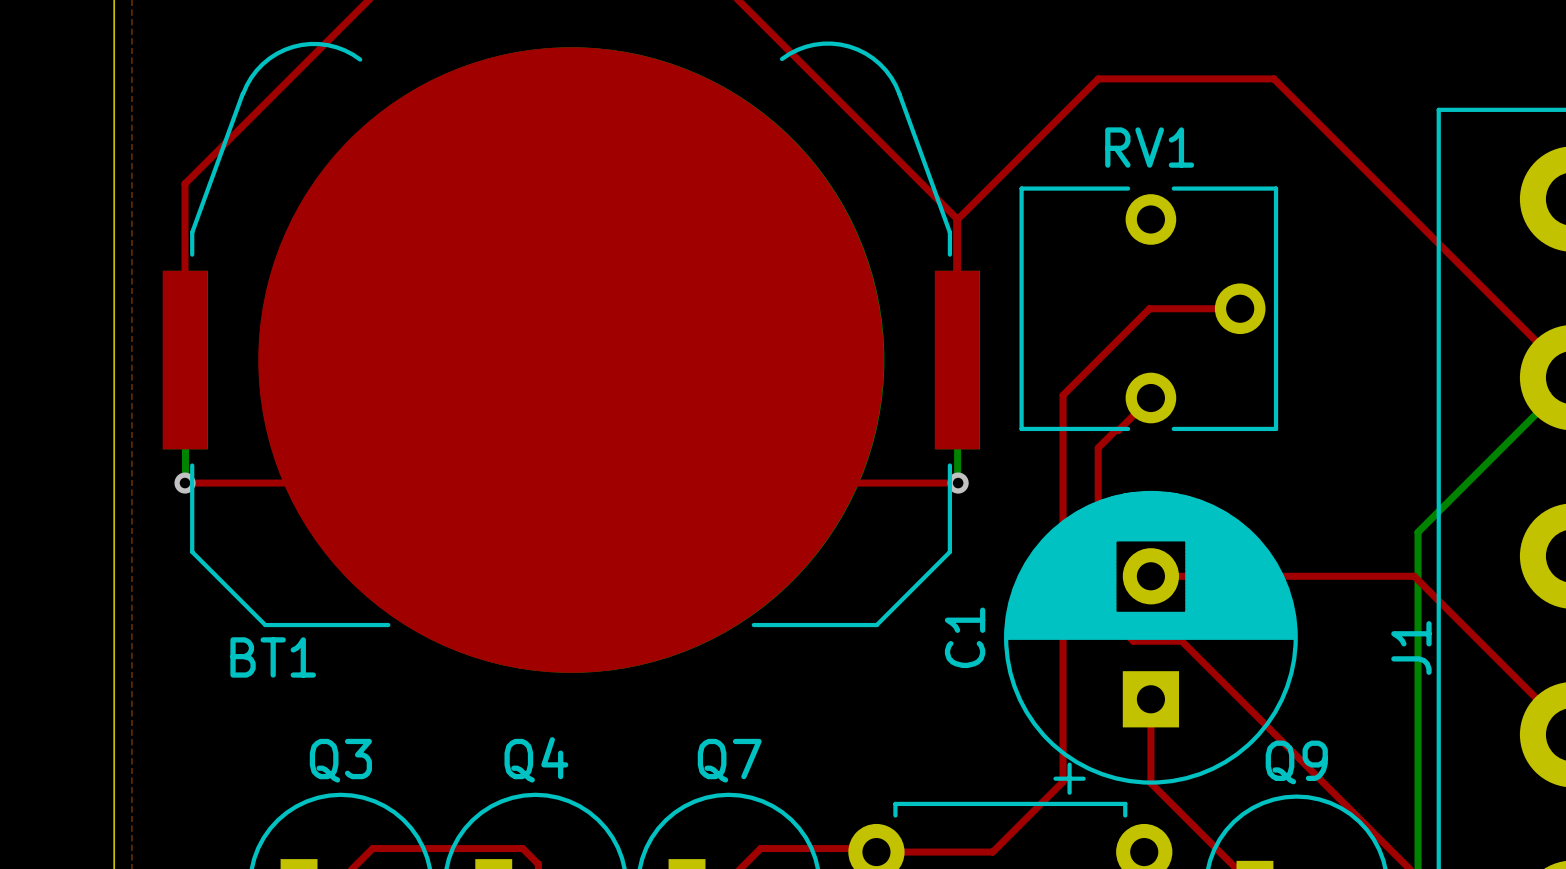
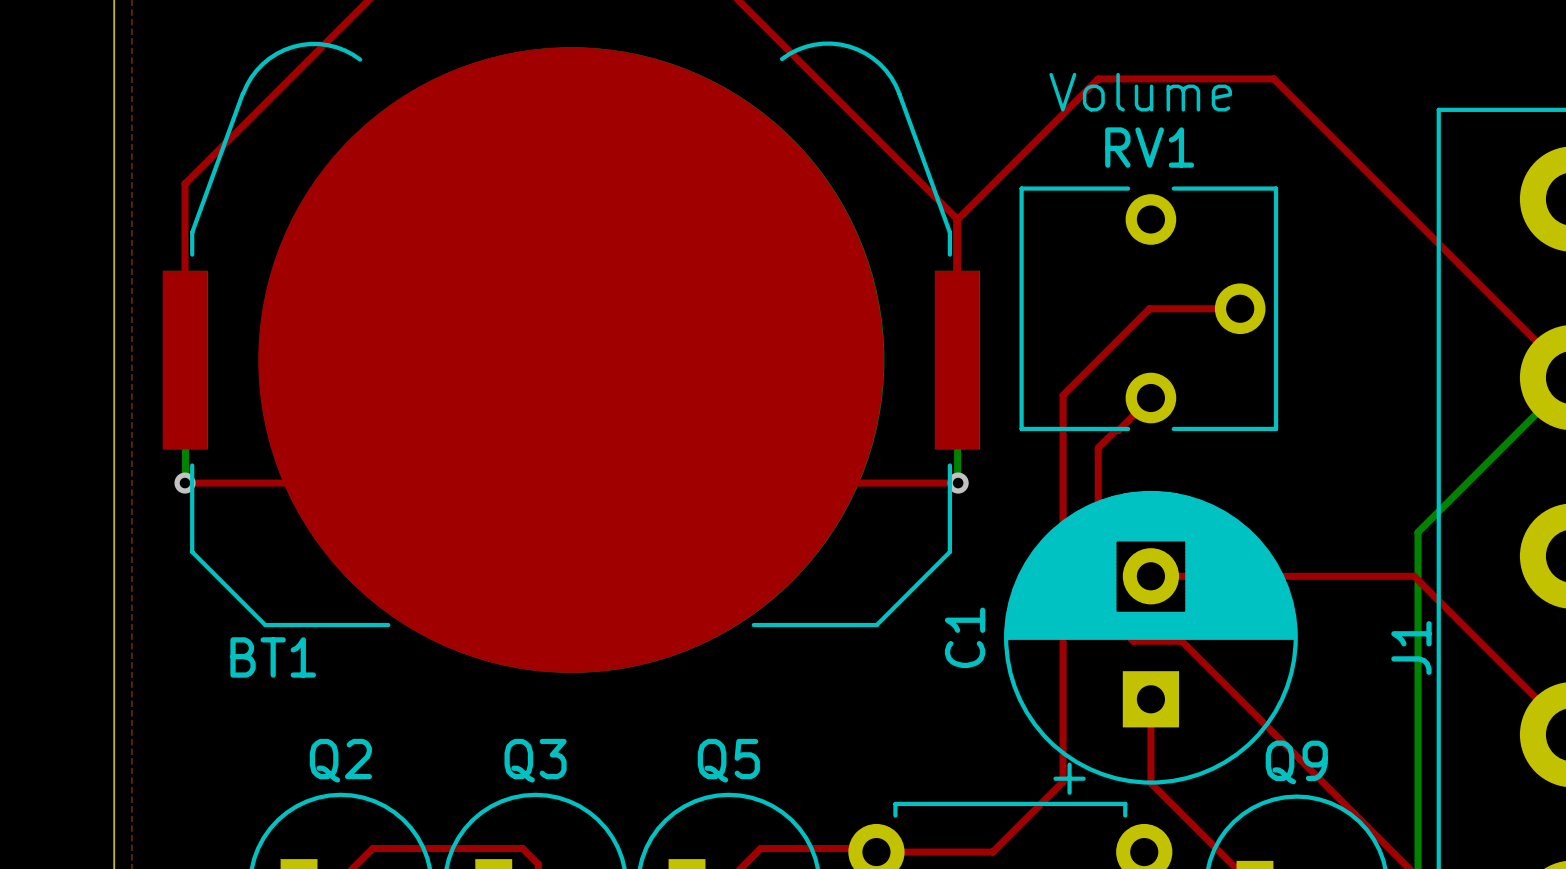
text: none -> Volume (1140, 92)
Q4 name: Q4 (536, 759) -> Q3 (535, 760)
Q3 name: Q3 (340, 760) -> Q2 (340, 760)
Q7 name: Q7 (729, 760) -> Q5 (728, 760)

